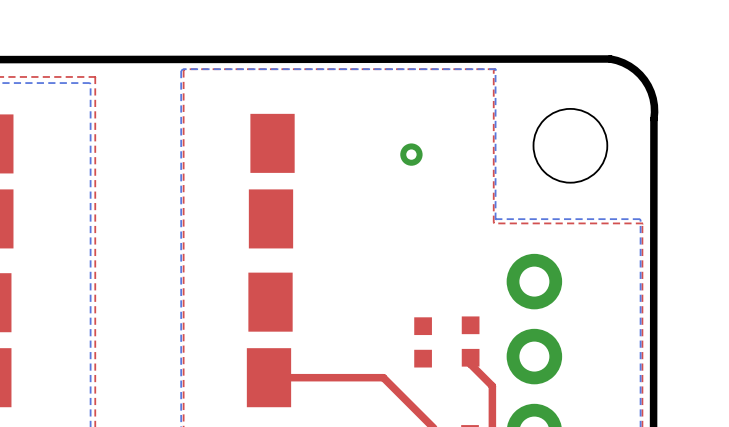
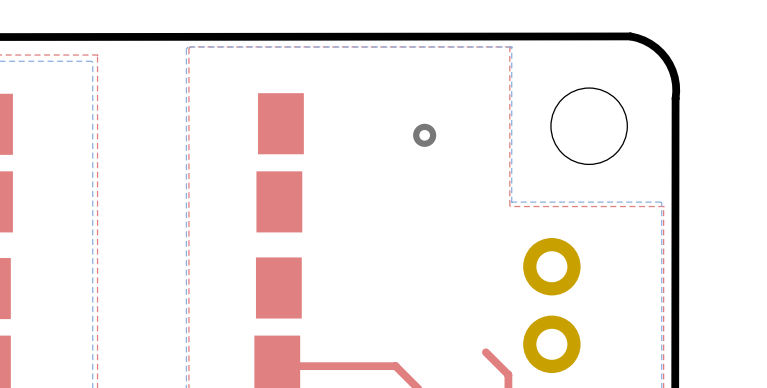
part: (470, 341) -> none
part: (423, 342) -> none

